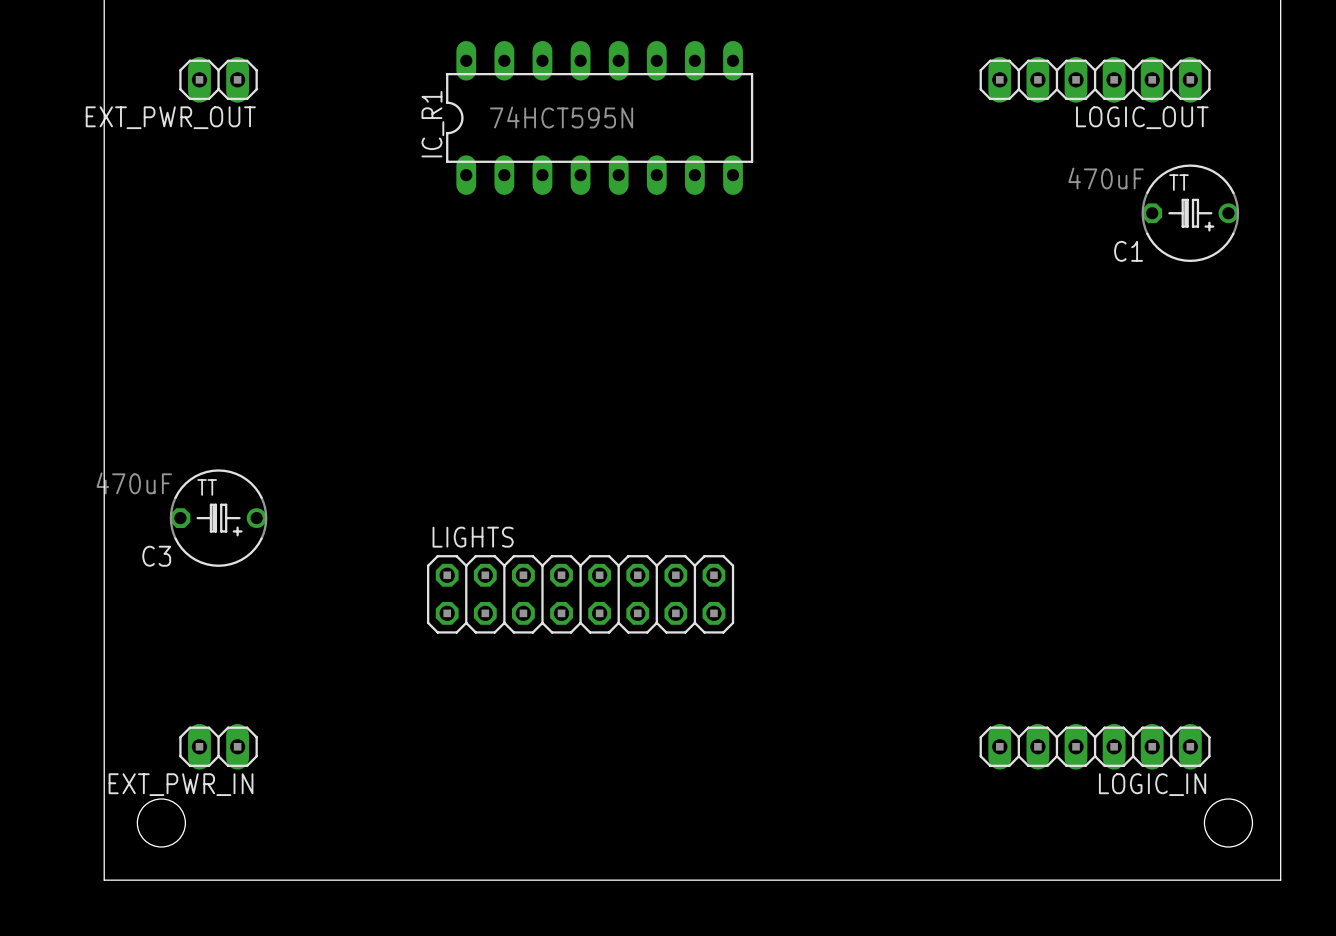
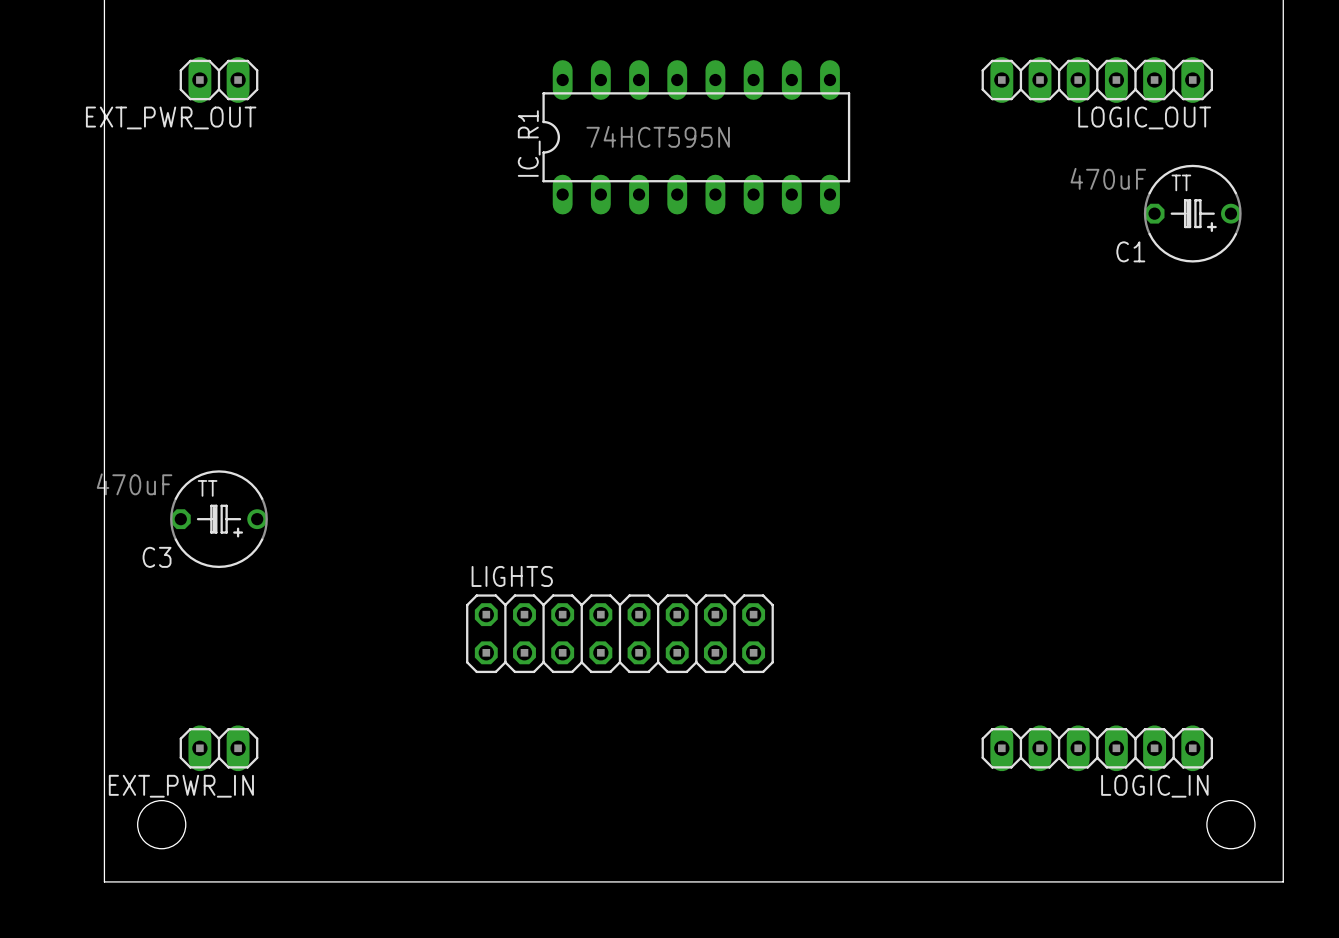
IC_R1 position: (599, 117) -> (696, 137)
LIGHTS position: (580, 594) -> (619, 633)

